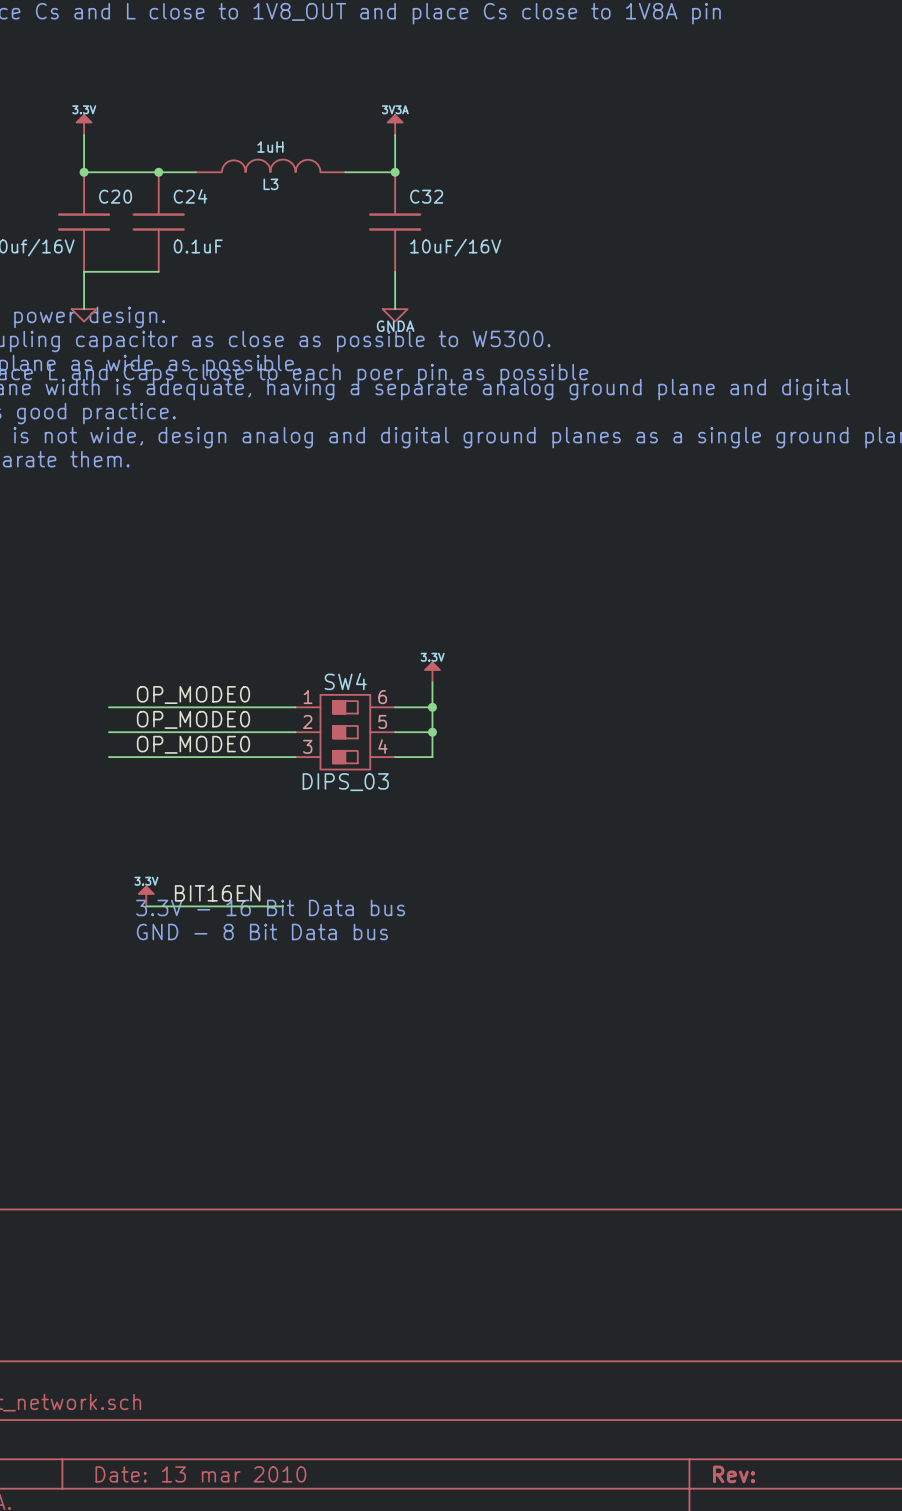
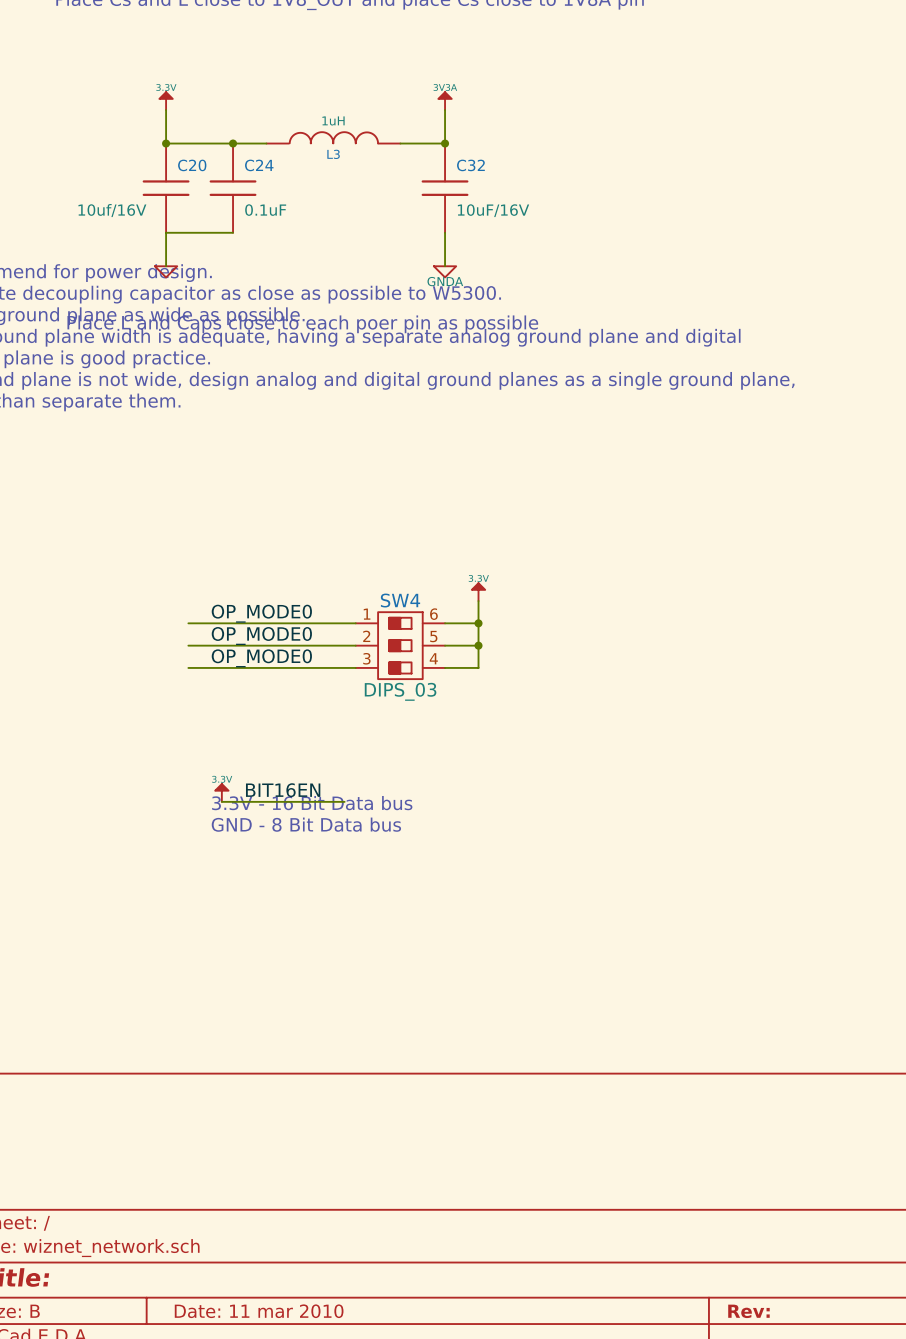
title block: Date: 13 mar 2010 (200, 1474) -> Date: 11 mar 2010 (259, 1311)

